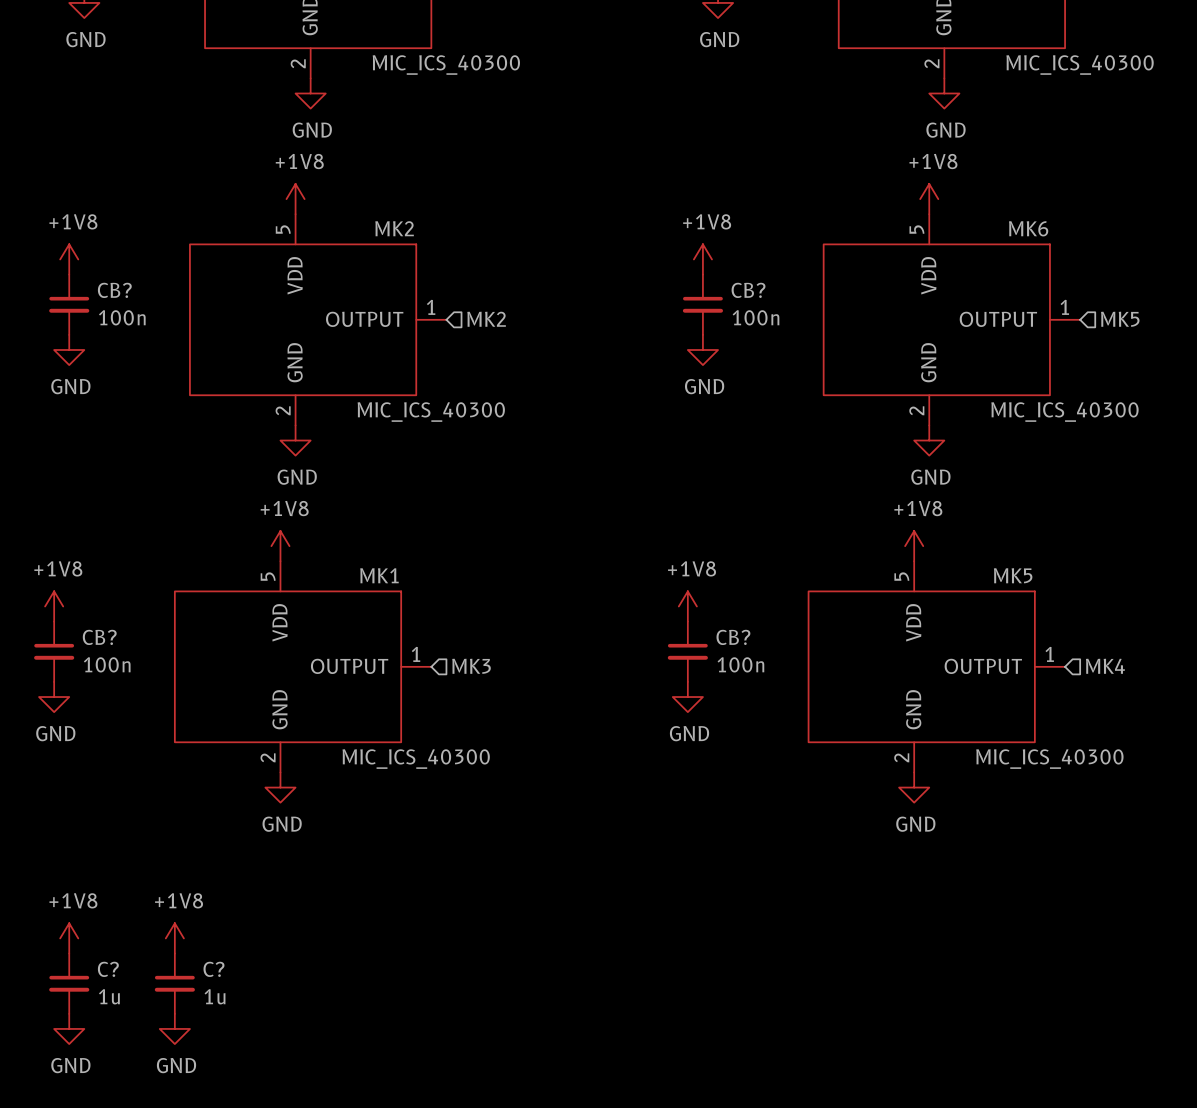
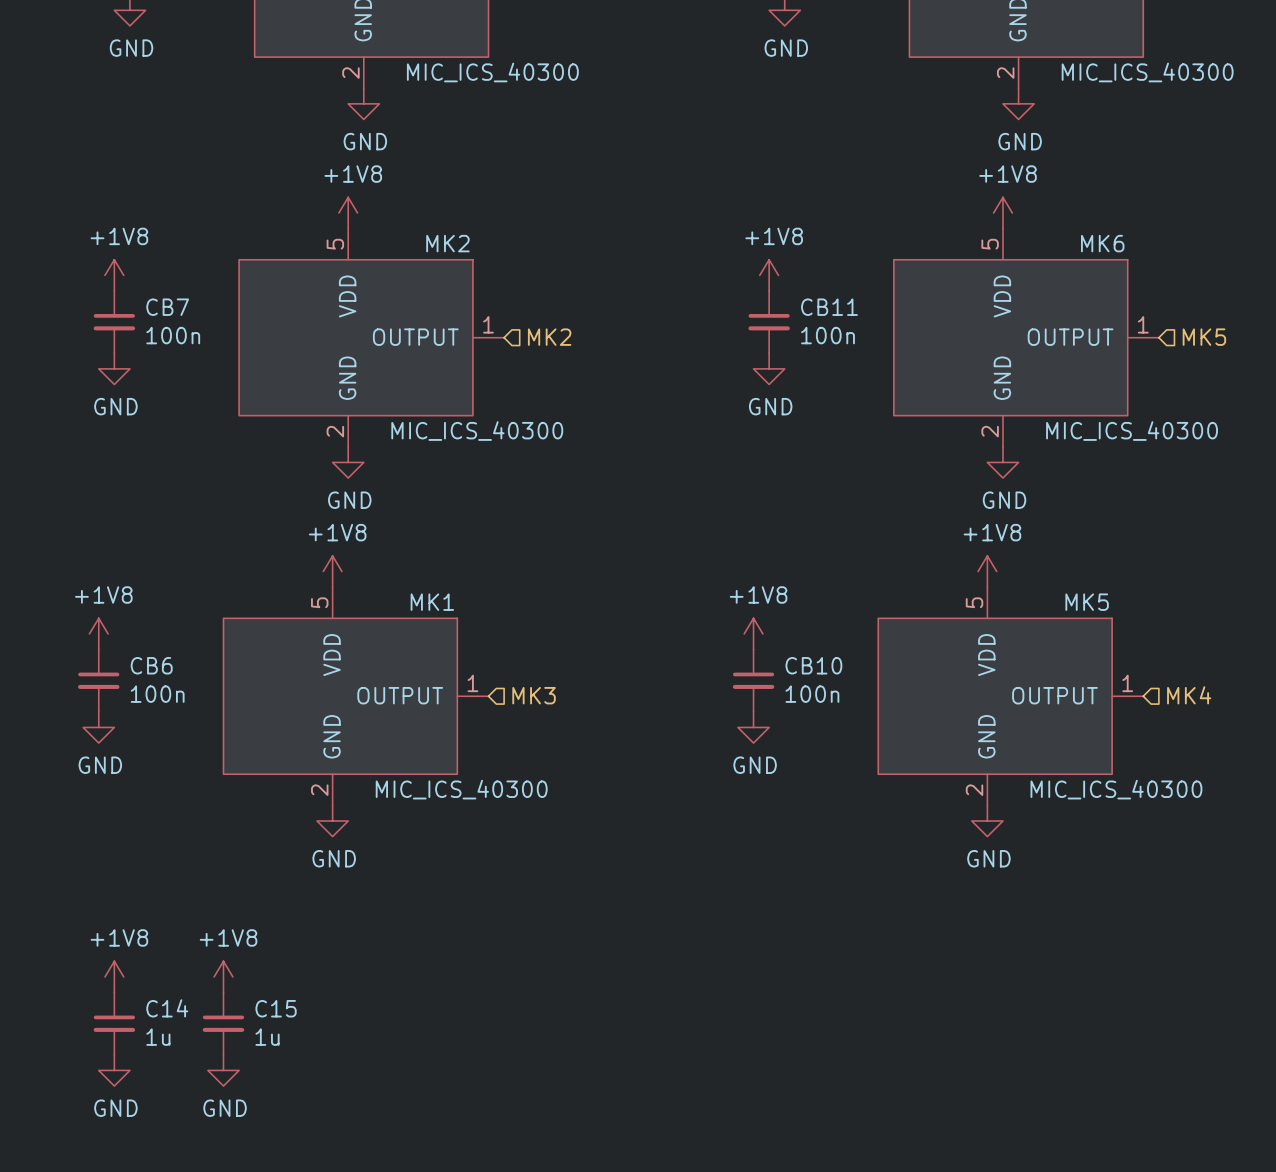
CB? name: CB? (114, 290) -> CB7 (167, 307)
CB? name: CB? (748, 290) -> CB11 (829, 307)
CB? name: CB? (99, 637) -> CB6 (151, 665)
CB? name: CB? (733, 637) -> CB10 (813, 665)
C? name: C? (108, 969) -> C14 (167, 1008)
C? name: C? (213, 969) -> C15 (276, 1008)

